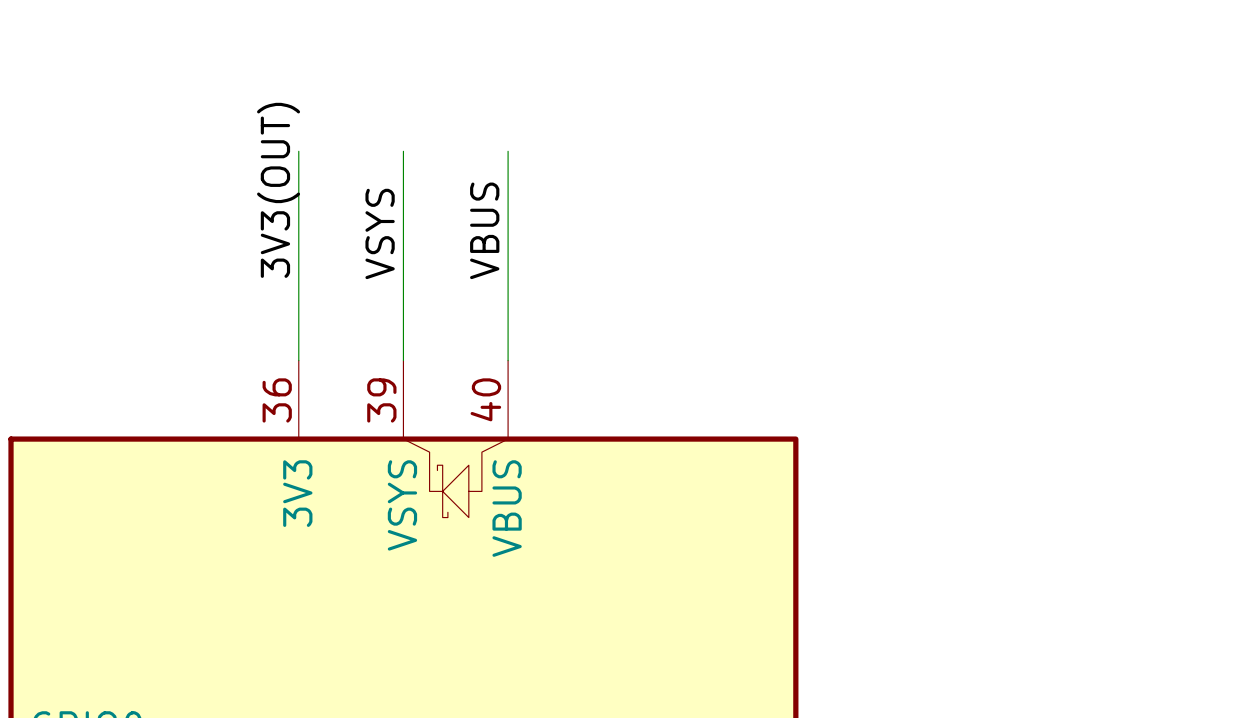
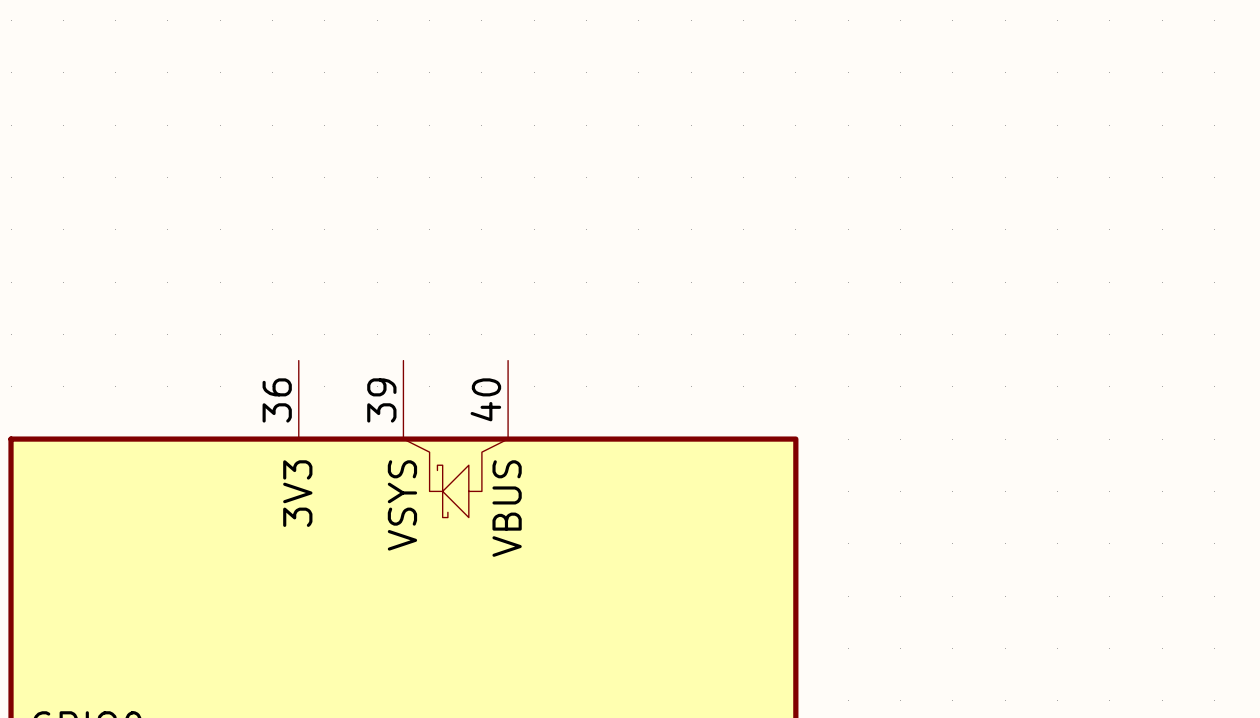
wire: (298, 151) (298, 360) -> none
wire: (403, 151) (403, 360) -> none
wire: (508, 151) (508, 360) -> none
label: 3V3(OUT) (278, 190) -> none
label: VBUS (484, 230) -> none
label: VSYS (380, 233) -> none

